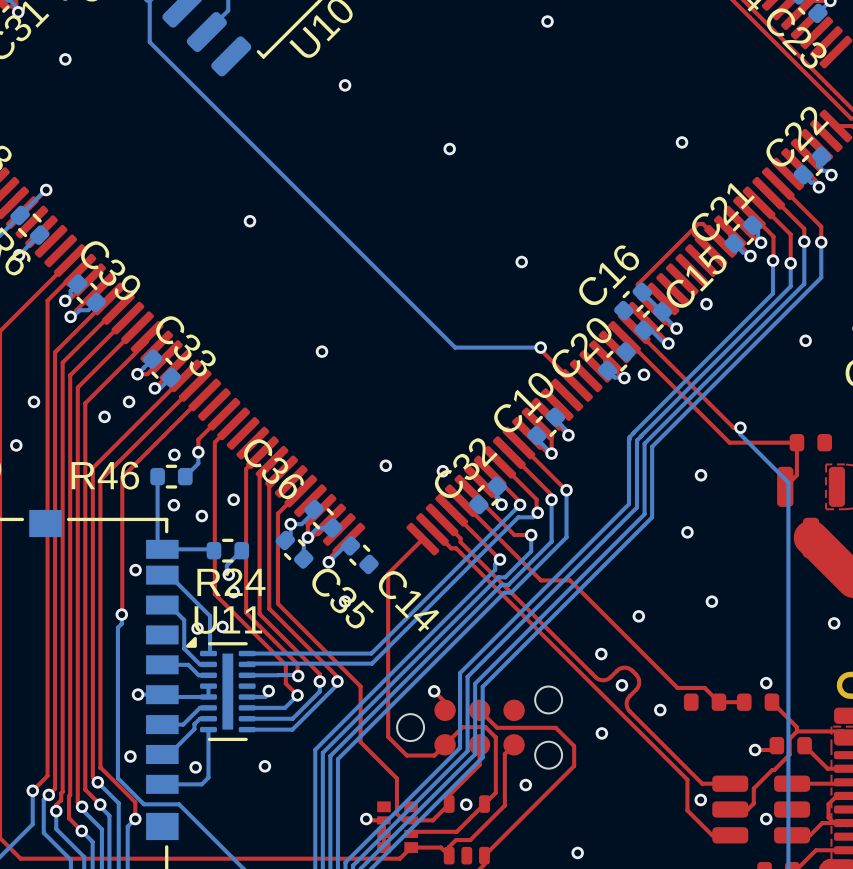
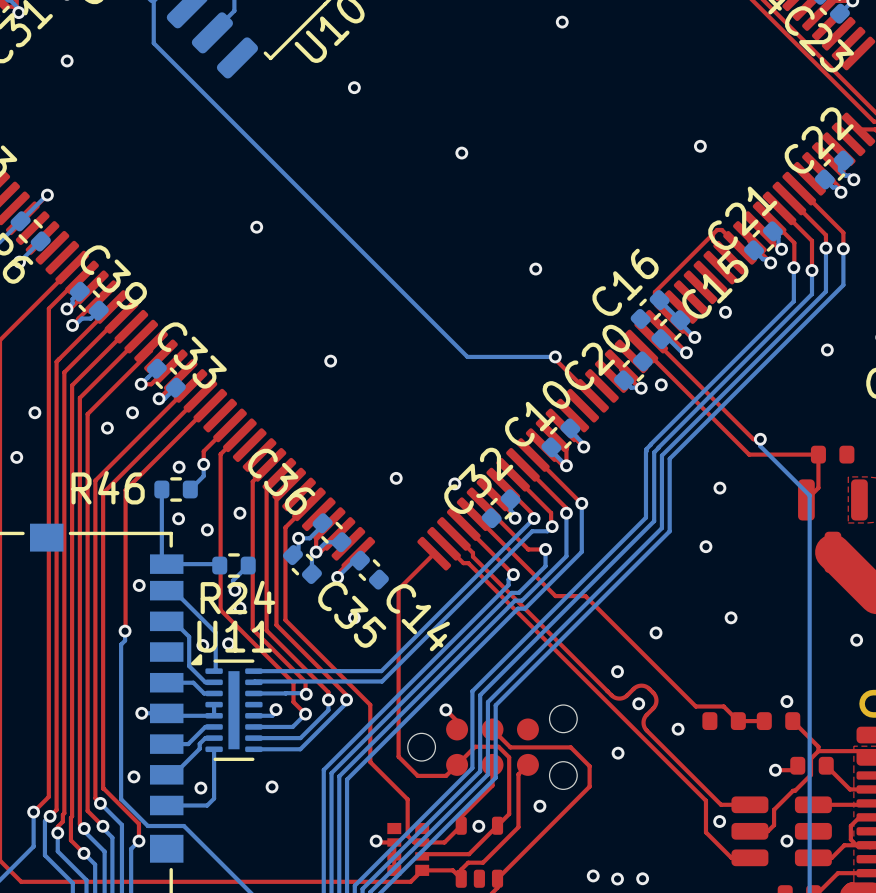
via: none -> (617, 879)
via: none -> (642, 878)

